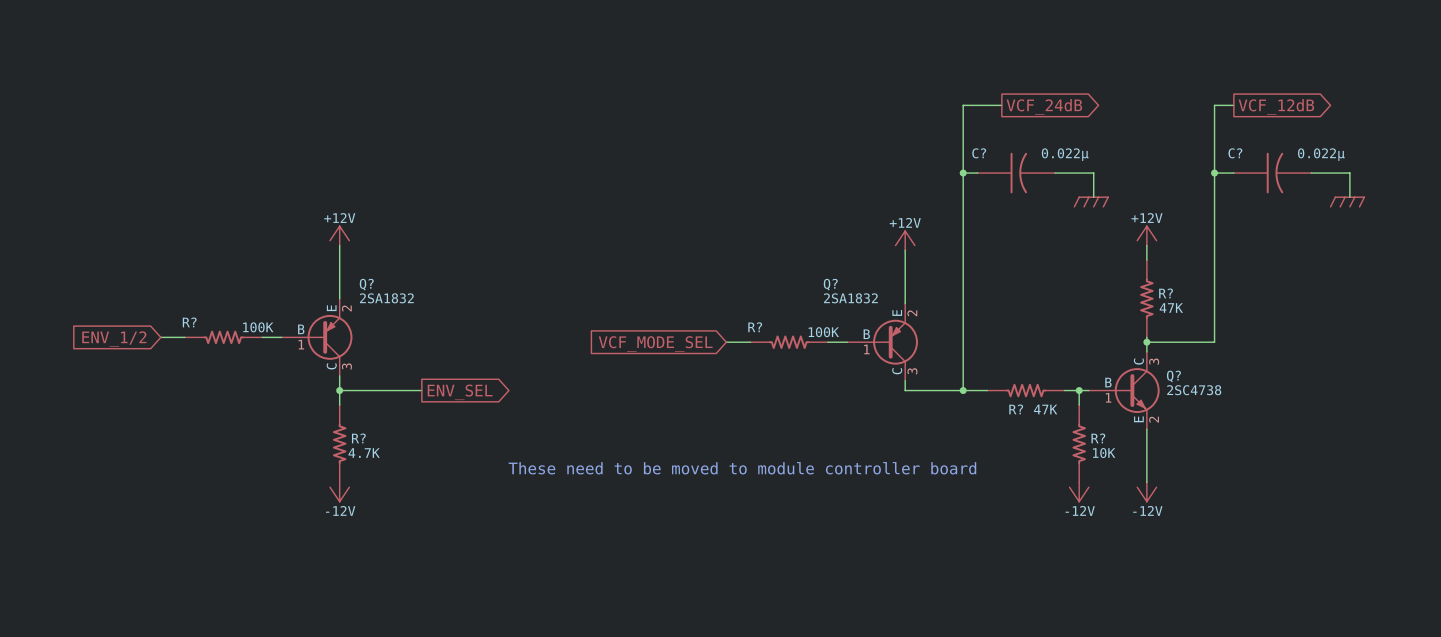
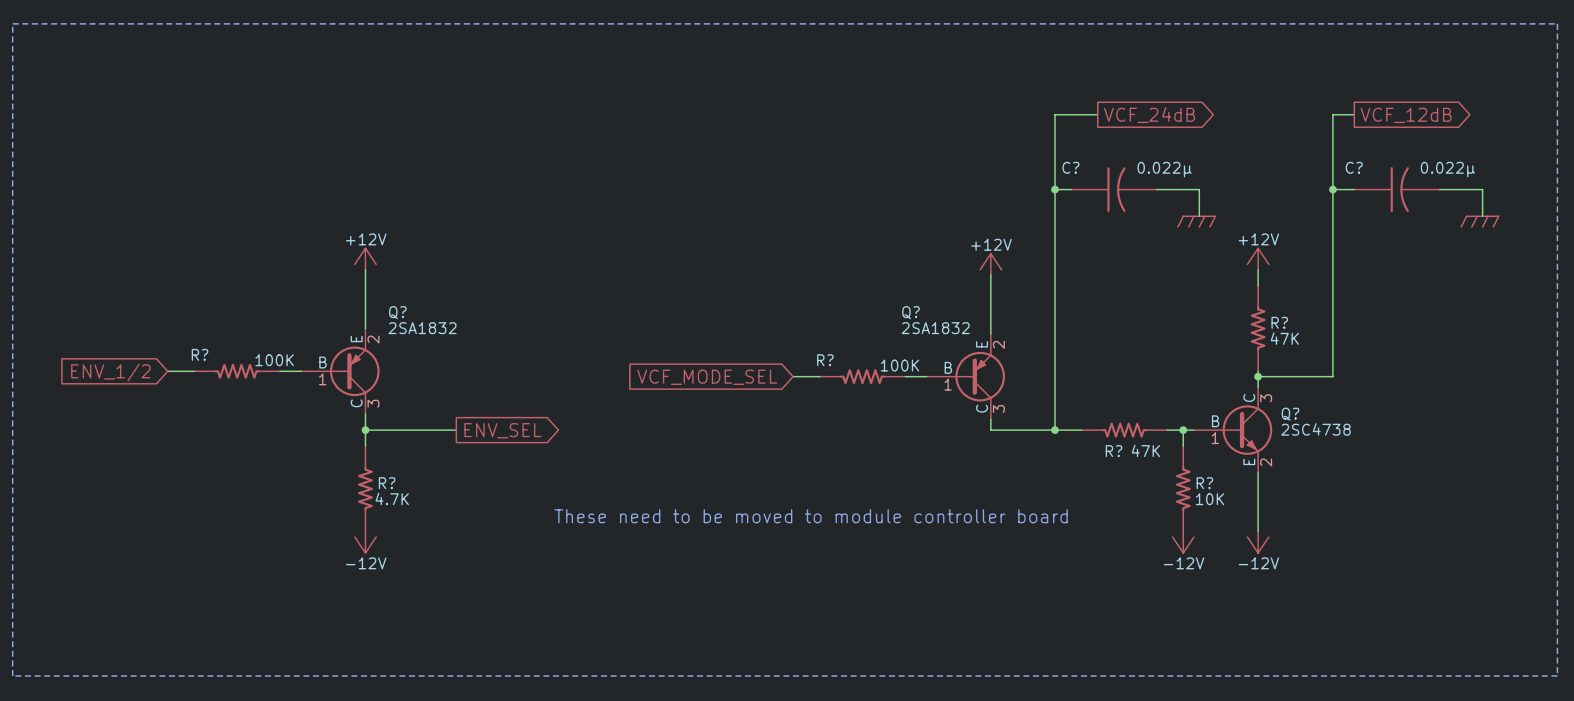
line: none -> (12, 23) (1557, 23) (1557, 675) (12, 675) (12, 23)

